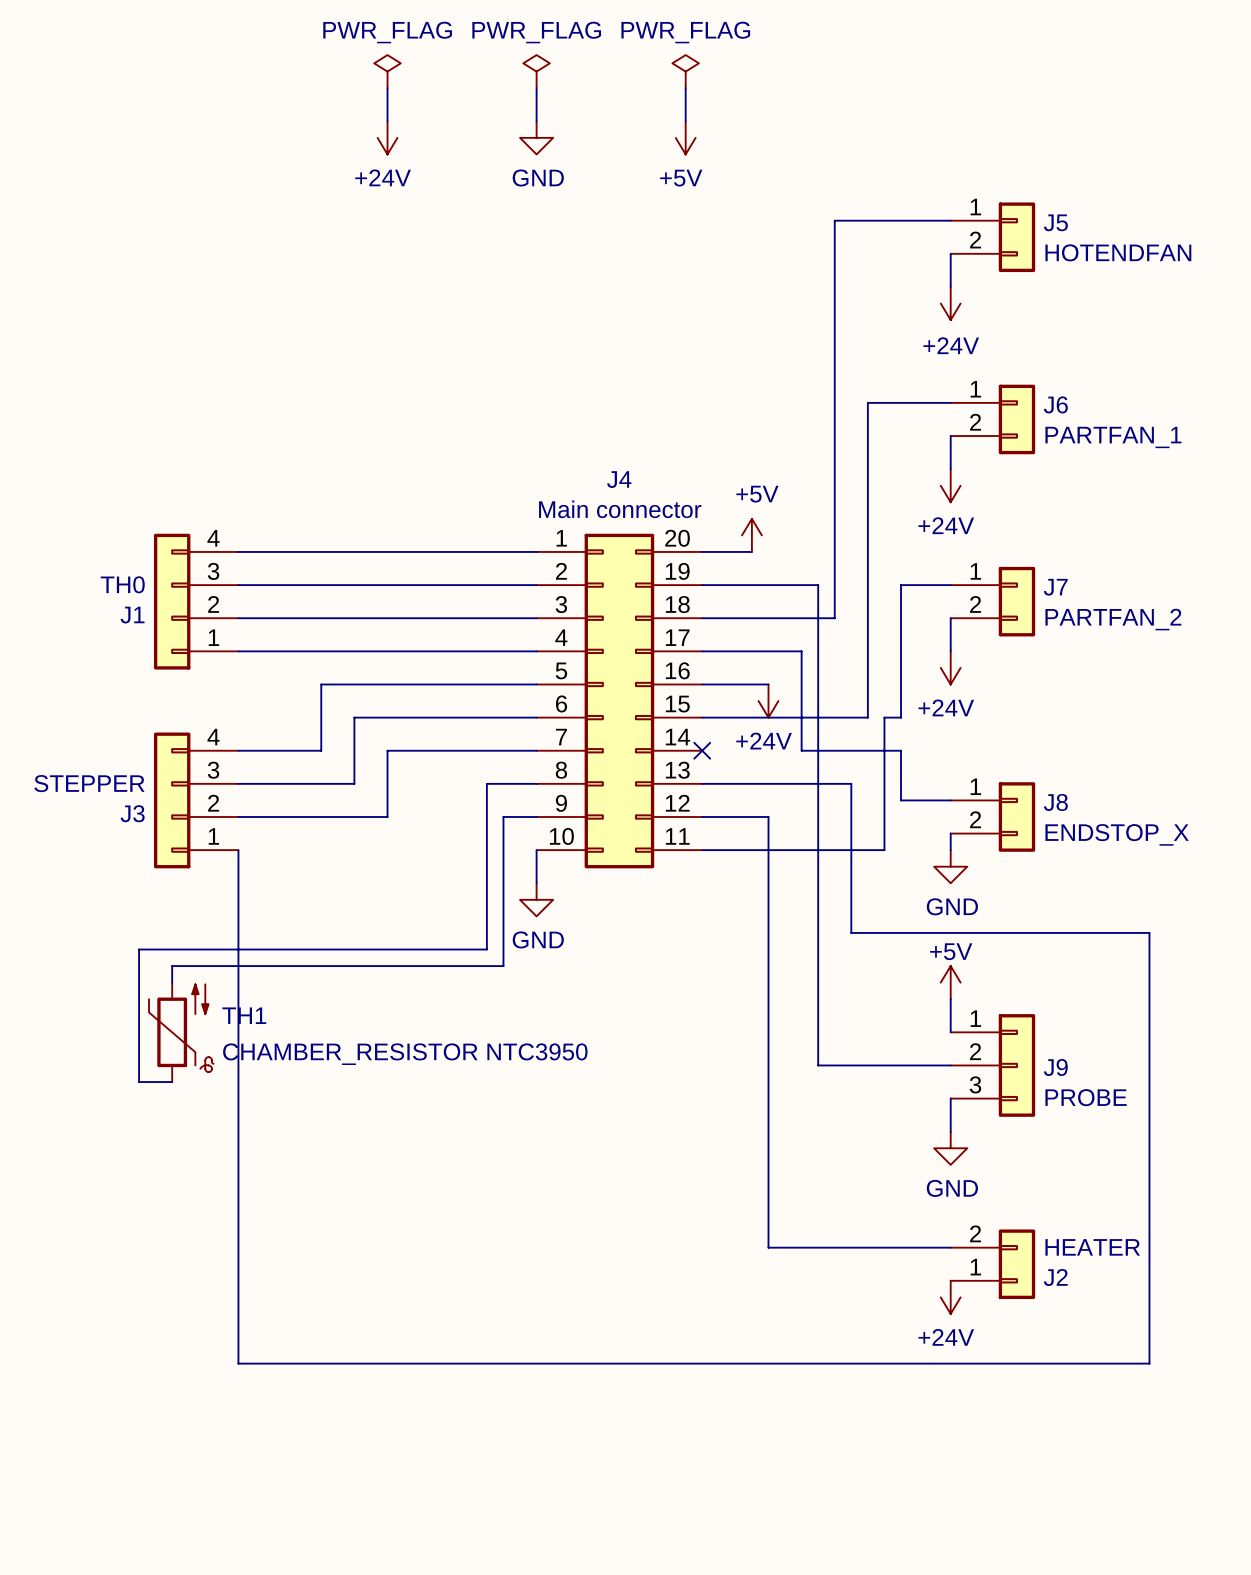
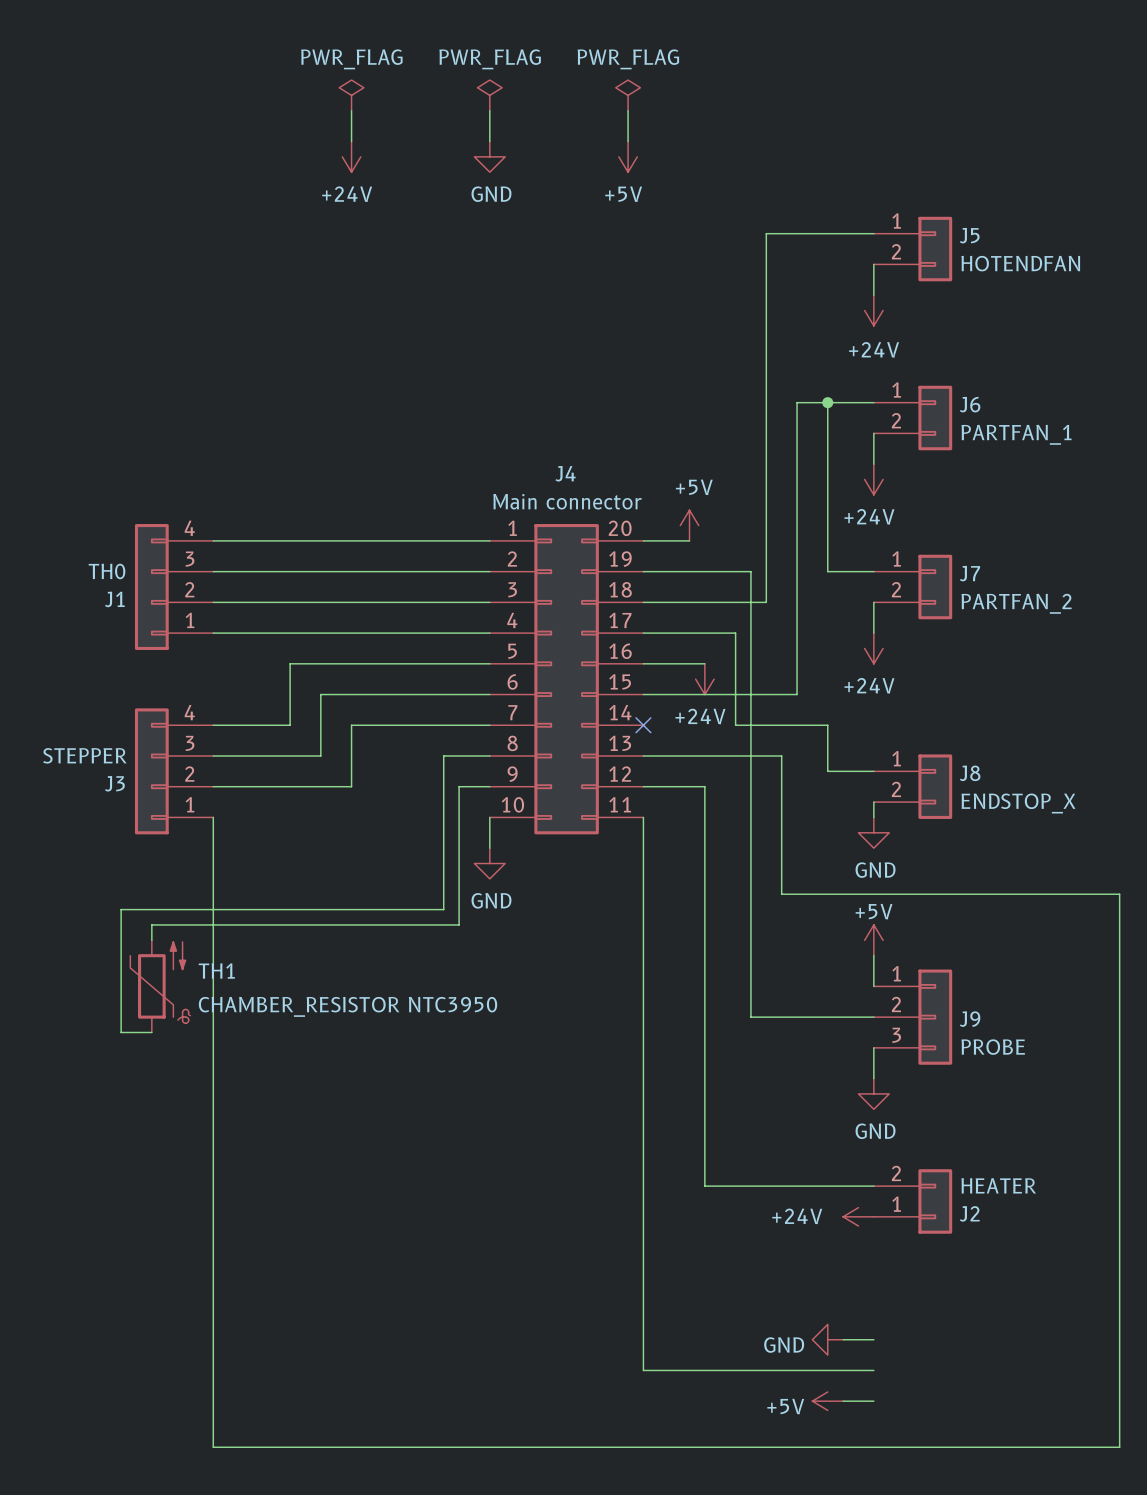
junction: none -> (827, 402)
wire: (901, 585) (901, 717) (884, 717) (884, 850) (702, 850) -> (827, 571) (827, 402)
wire: none -> (643, 817) (643, 1370) (873, 1370)
wire: (1149, 932) (1149, 1363) (238, 1363) -> (1058, 894) (1119, 894) (1119, 1447) (213, 1447) (213, 1293)
power symbol rotation: 0° (950, 1297) -> 90° clockwise (858, 1216)
power symbol position: +24V (950, 1297) -> +24V (858, 1216)
power symbol: none -> GND (827, 1339)
wire: none -> (843, 1339) (873, 1339)
power symbol: none -> +5V (827, 1401)
wire: none -> (843, 1401) (873, 1401)

